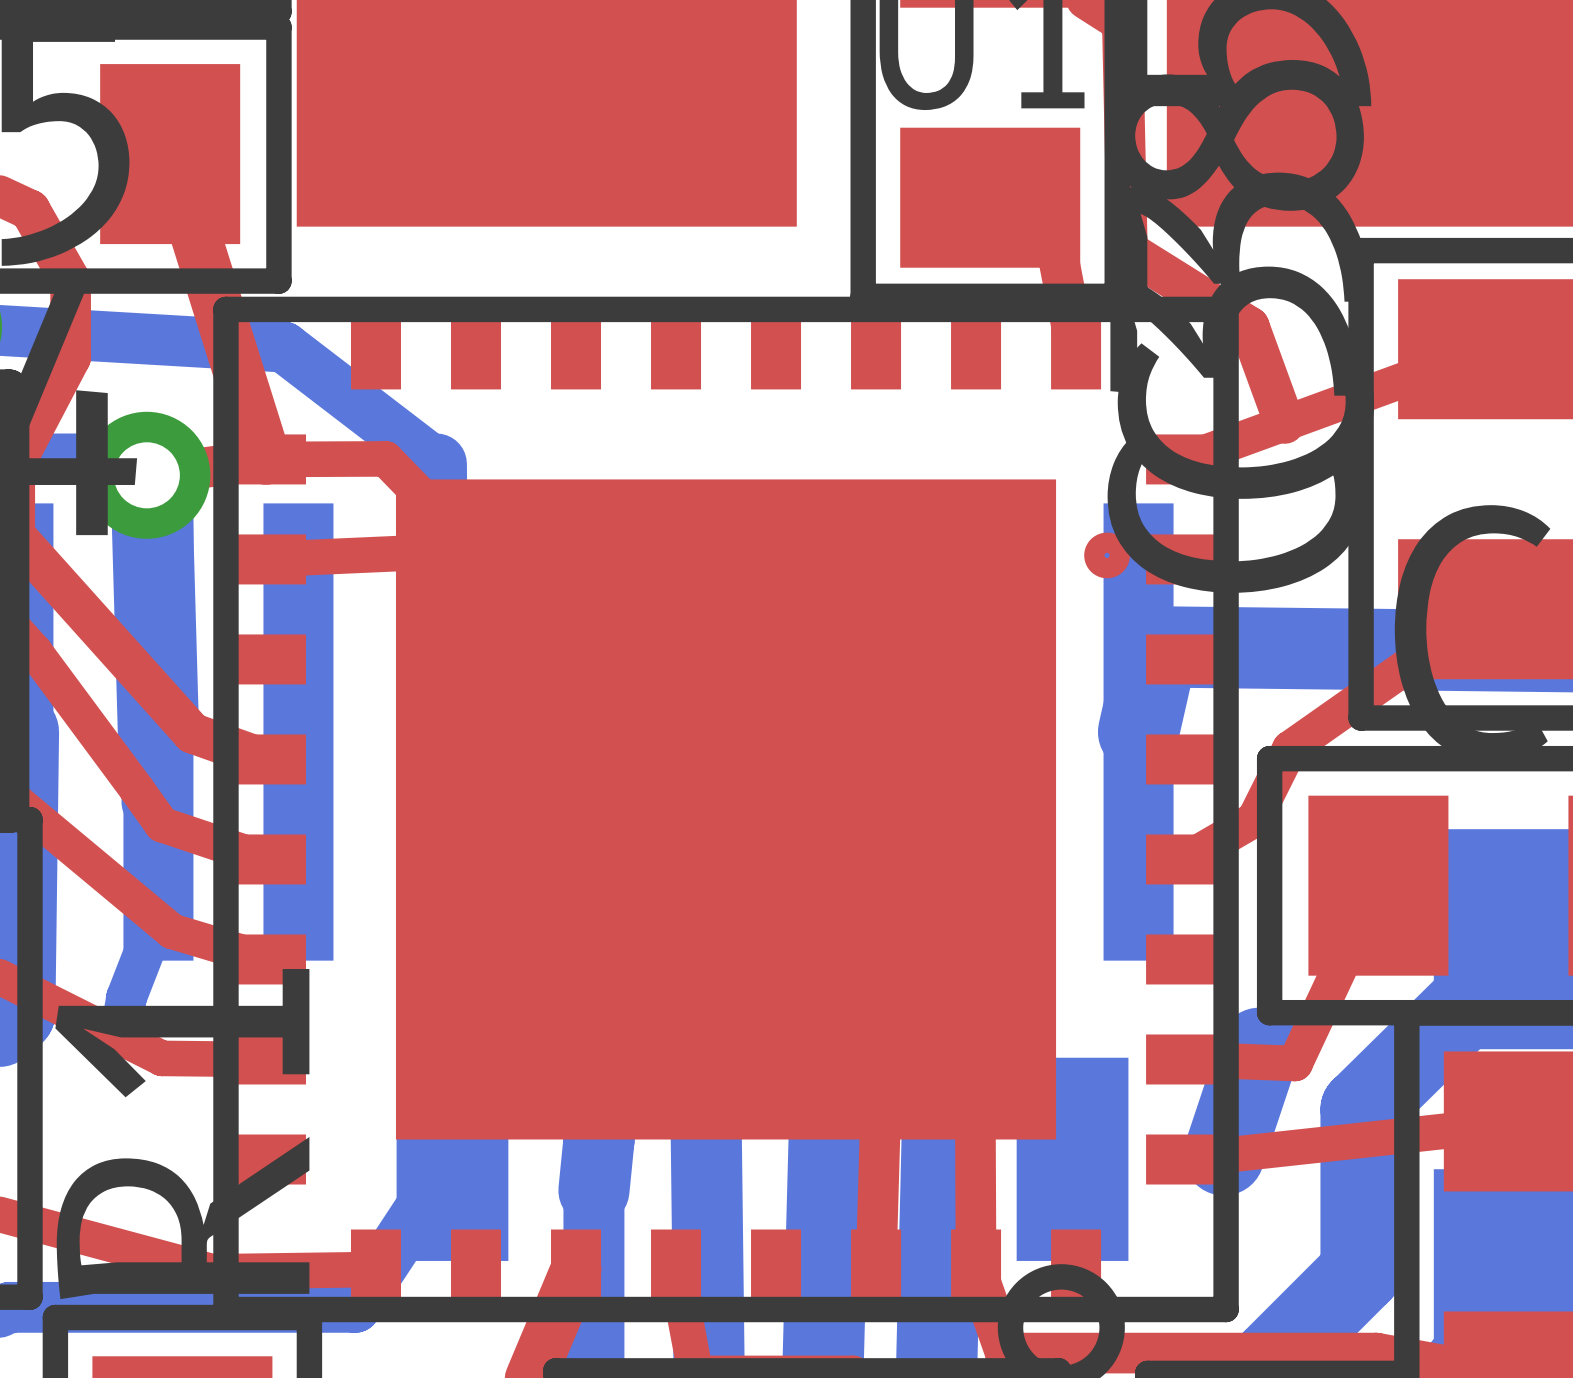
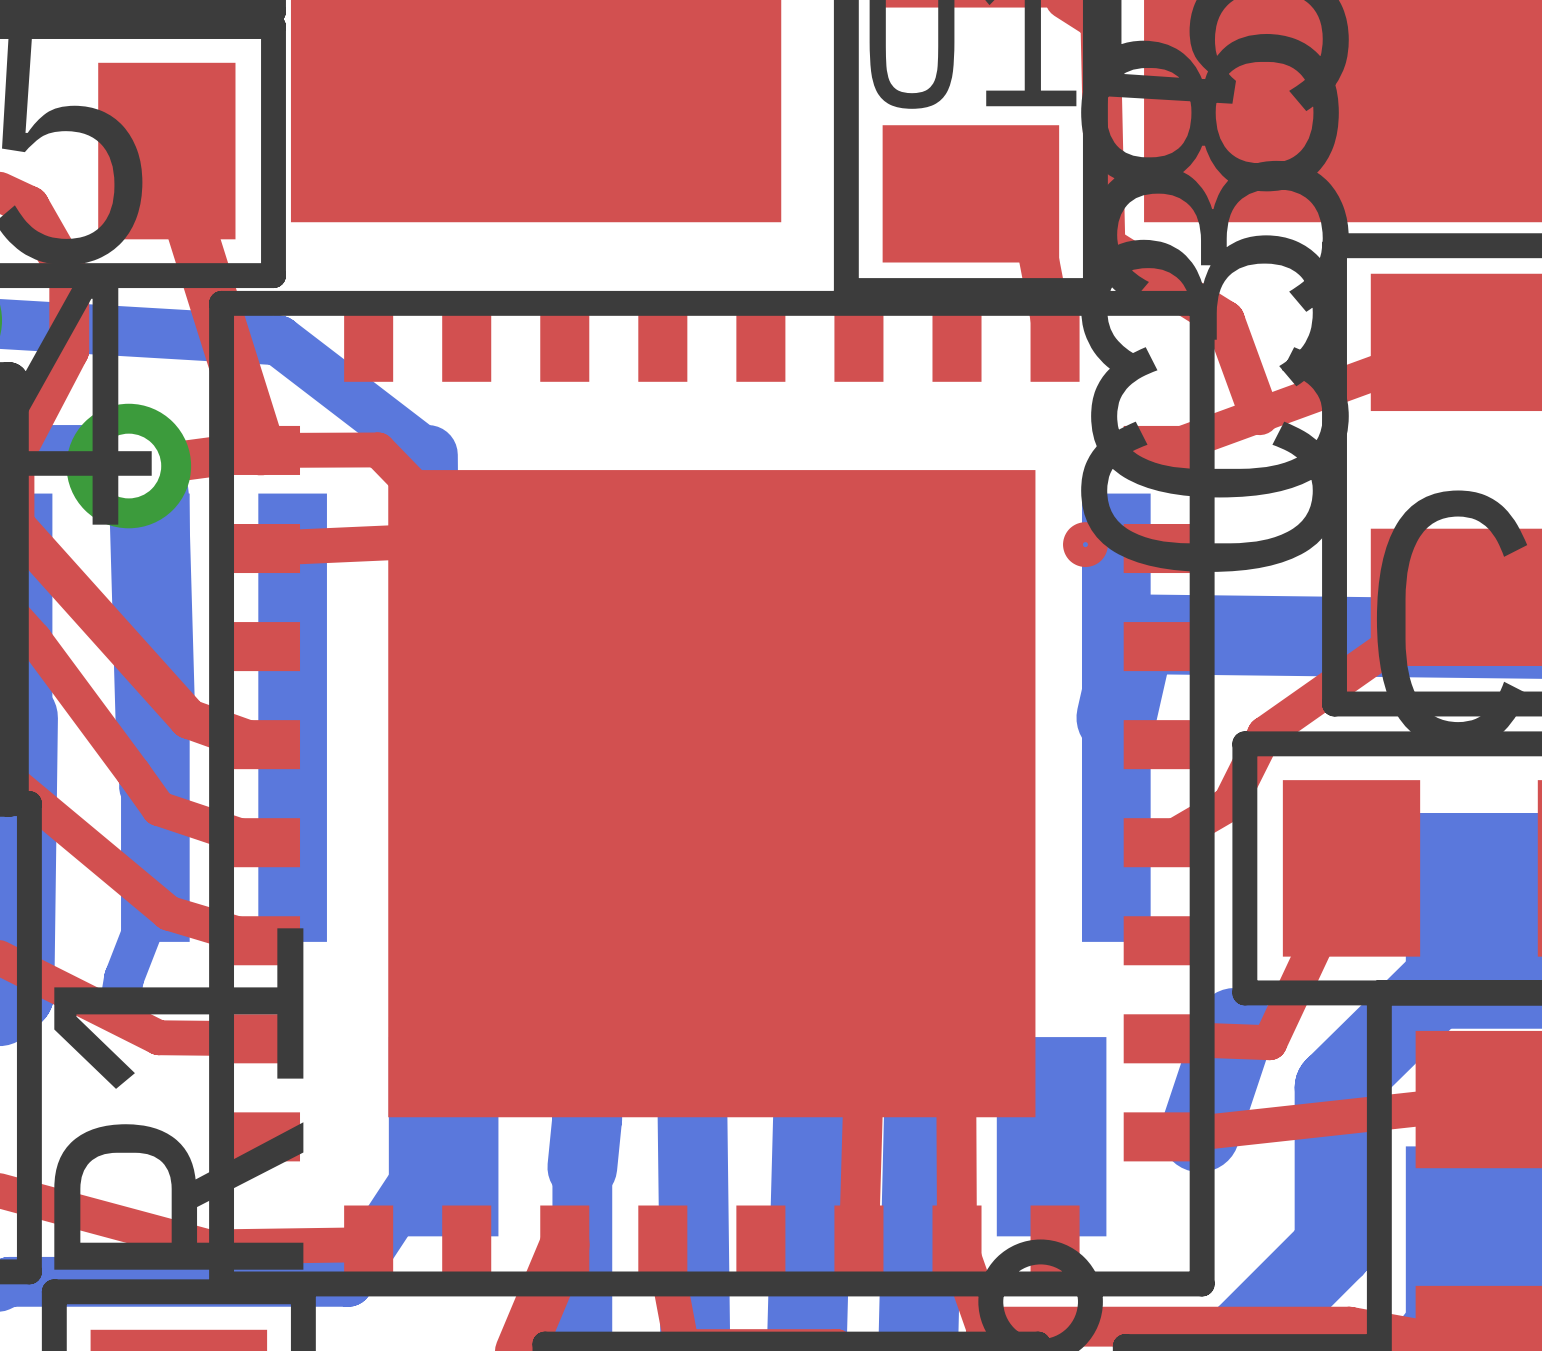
via position: (146, 475) -> (128, 466)

